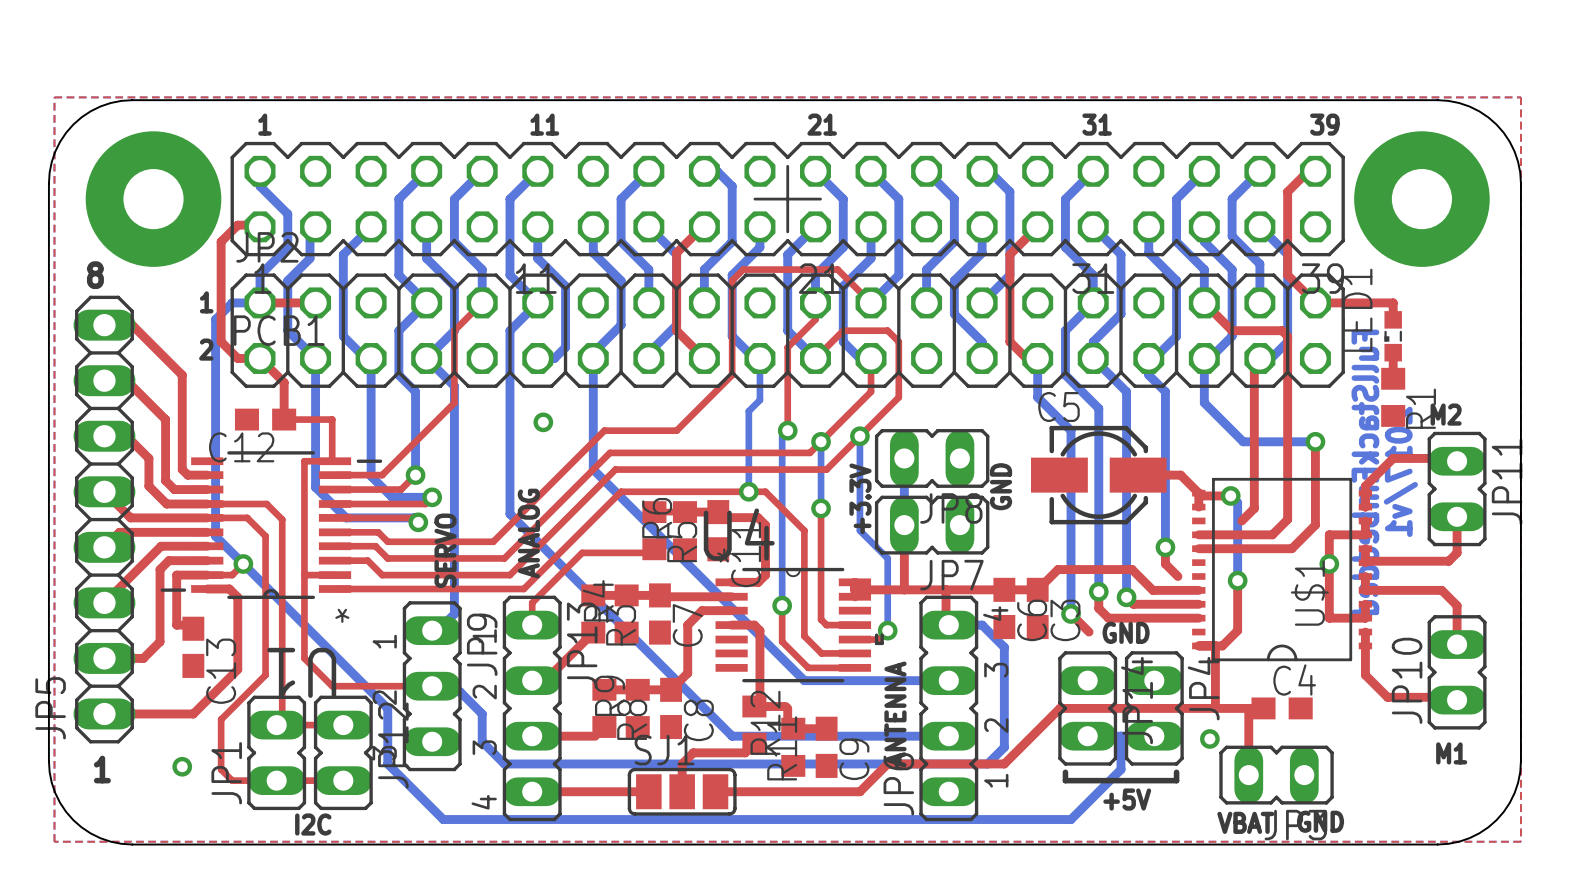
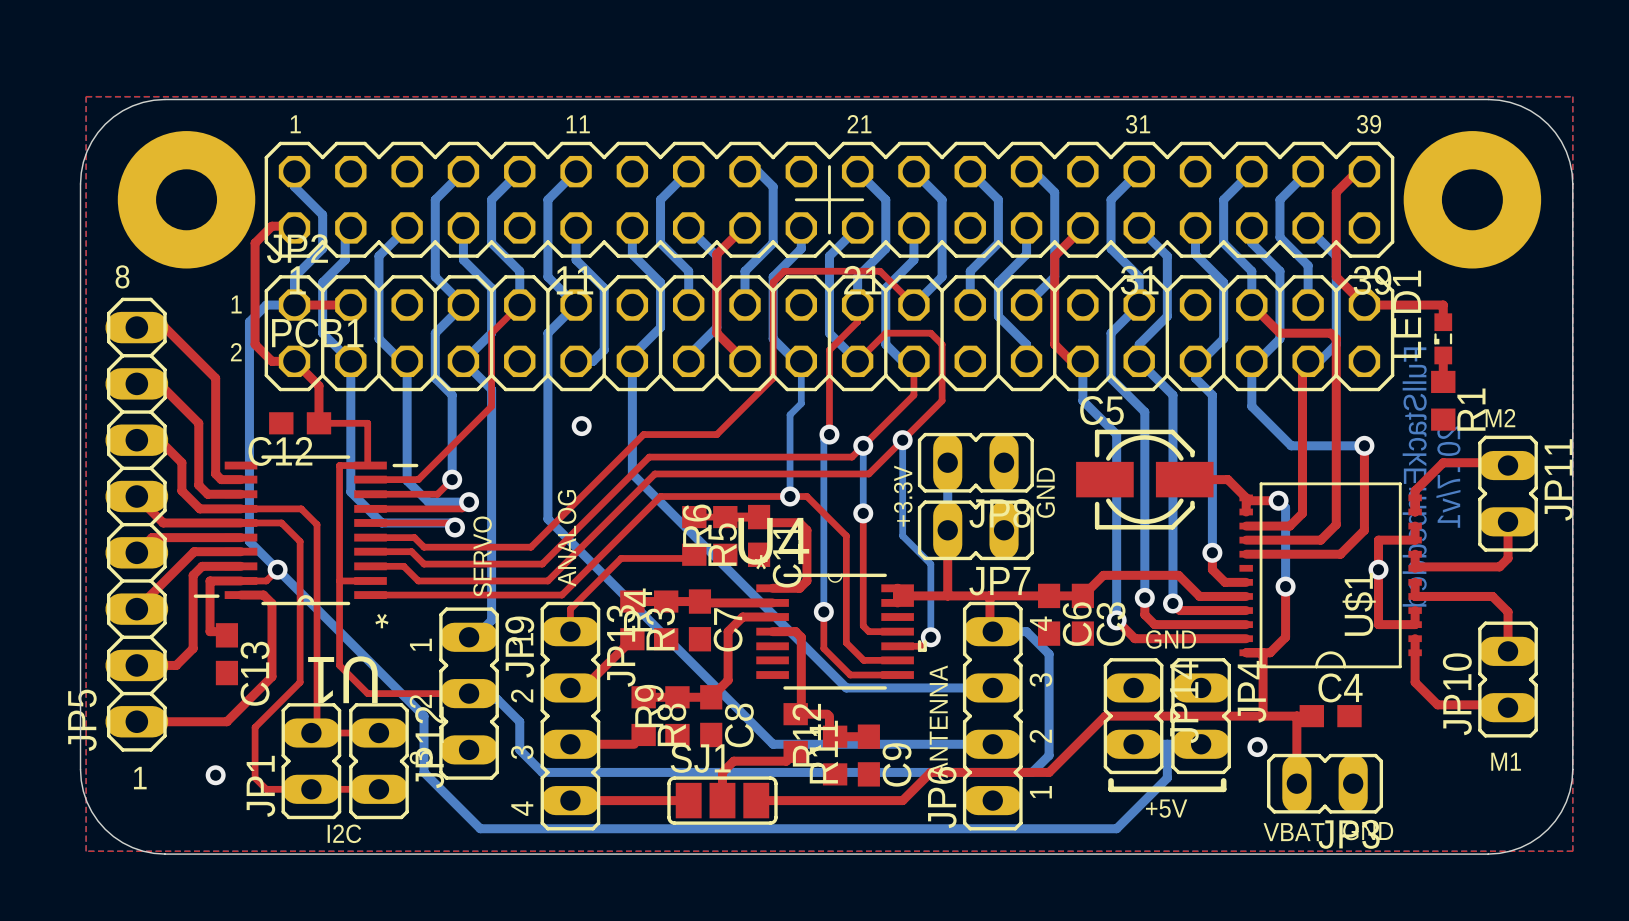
top track: none -> (1246, 526) (1289, 526)
top track: none -> (1225, 582) (1246, 582)
top track: none -> (1134, 638) (1246, 638)

